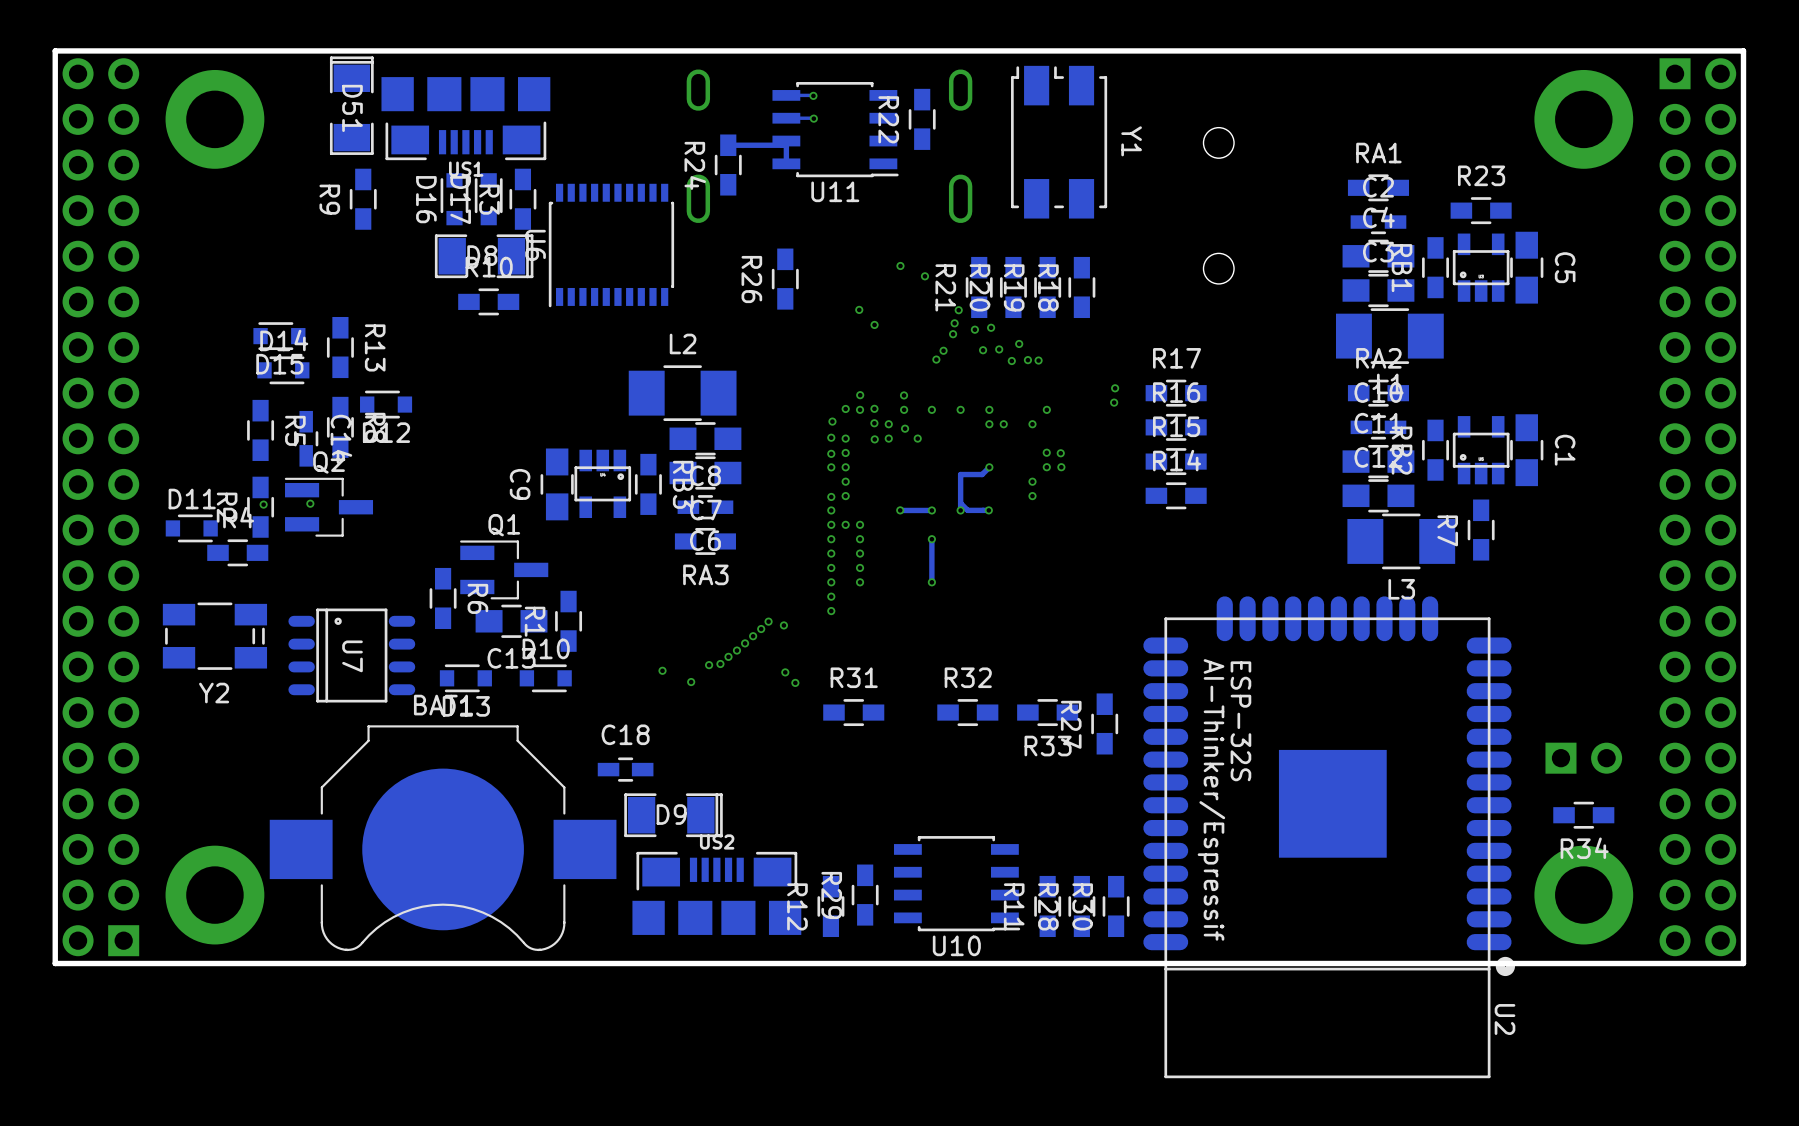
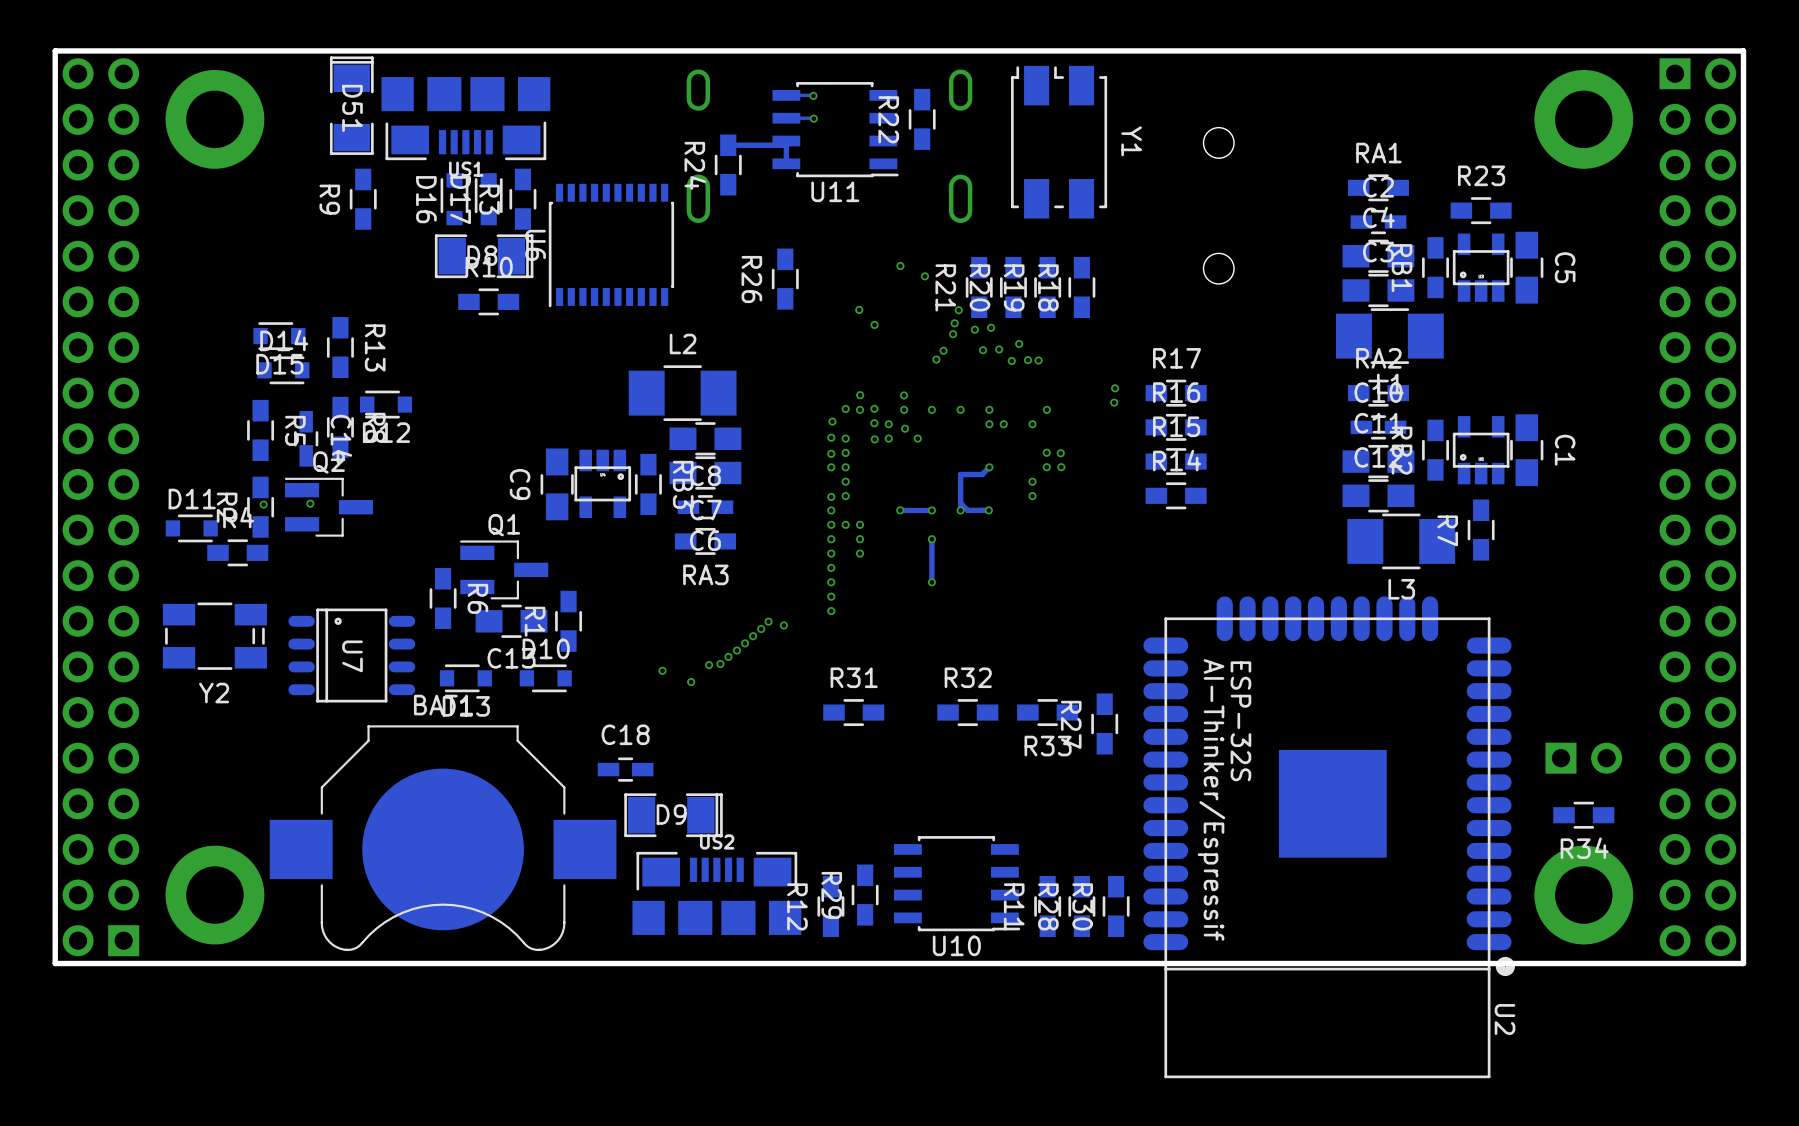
via: (860, 567) -> none
via: (860, 582) -> none
via: (785, 672) -> none
via: (795, 682) -> none

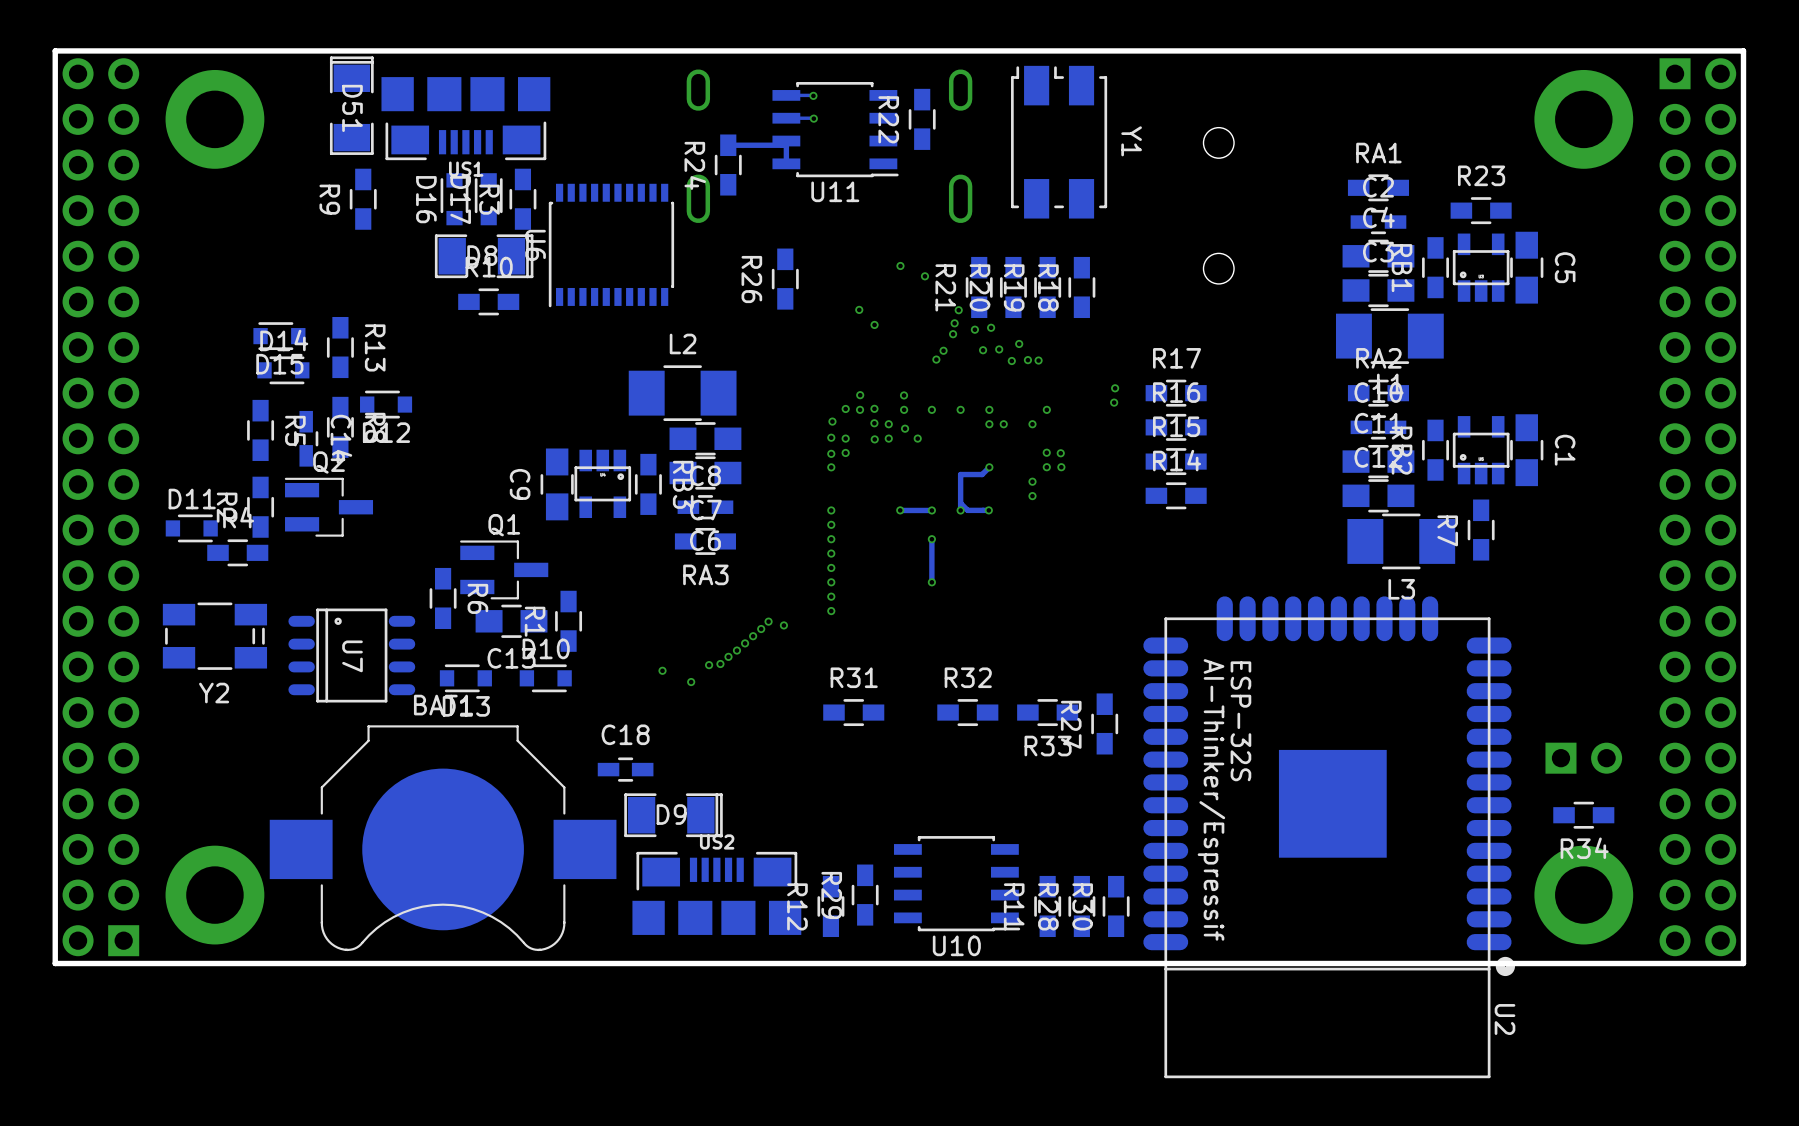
via: (845, 467) -> none
via: (845, 481) -> none
via: (831, 496) -> none
via: (845, 496) -> none
via: (310, 503) -> none
via: (263, 504) -> none
via: (845, 524) -> none
via: (860, 524) -> none
via: (860, 539) -> none
via: (860, 553) -> none

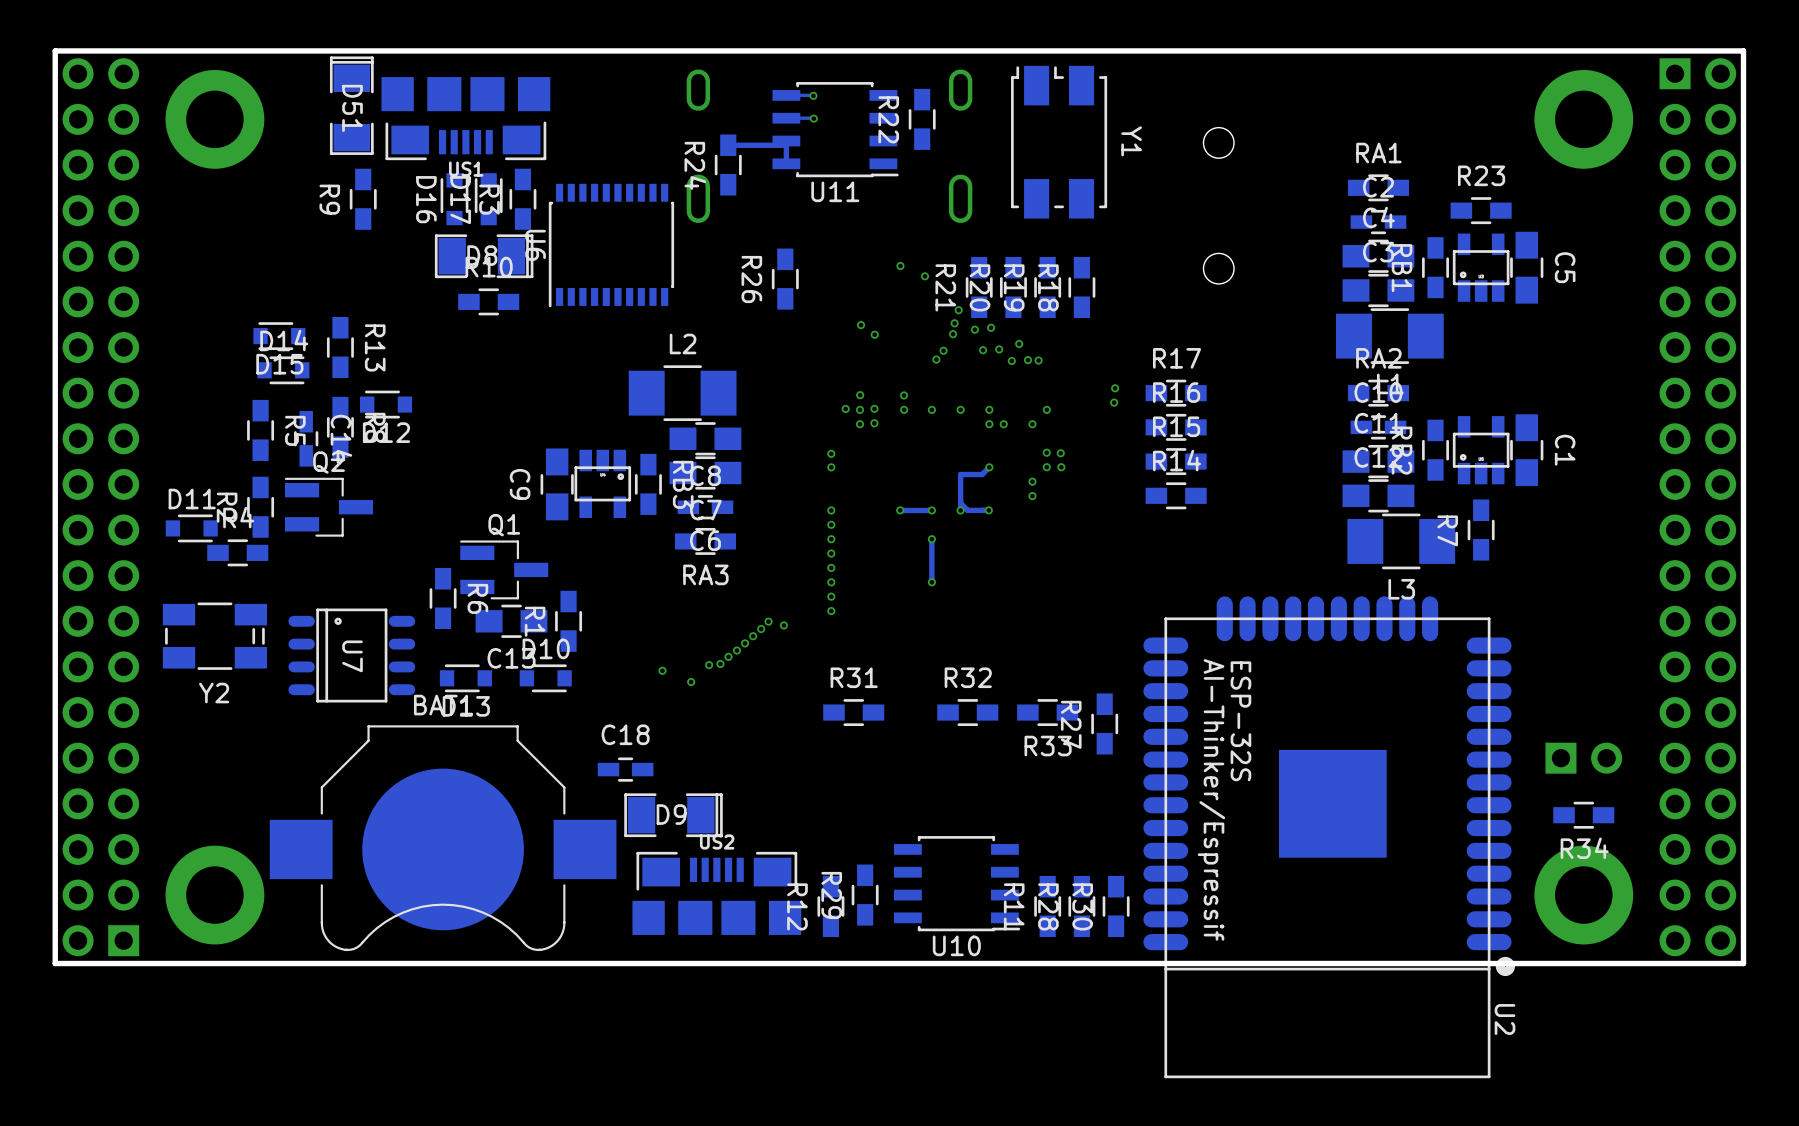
via: (859, 309) -> none
via: (874, 324) -> none
via: none -> (861, 325)
via: none -> (874, 334)
via: (832, 421) -> none
via: none -> (860, 424)
via: (888, 424) -> none
via: (905, 428) -> none
via: (831, 437) -> none
via: (845, 438) -> none
via: (888, 438) -> none
via: (917, 438) -> none
via: (874, 439) -> none
via: (845, 452) -> none

